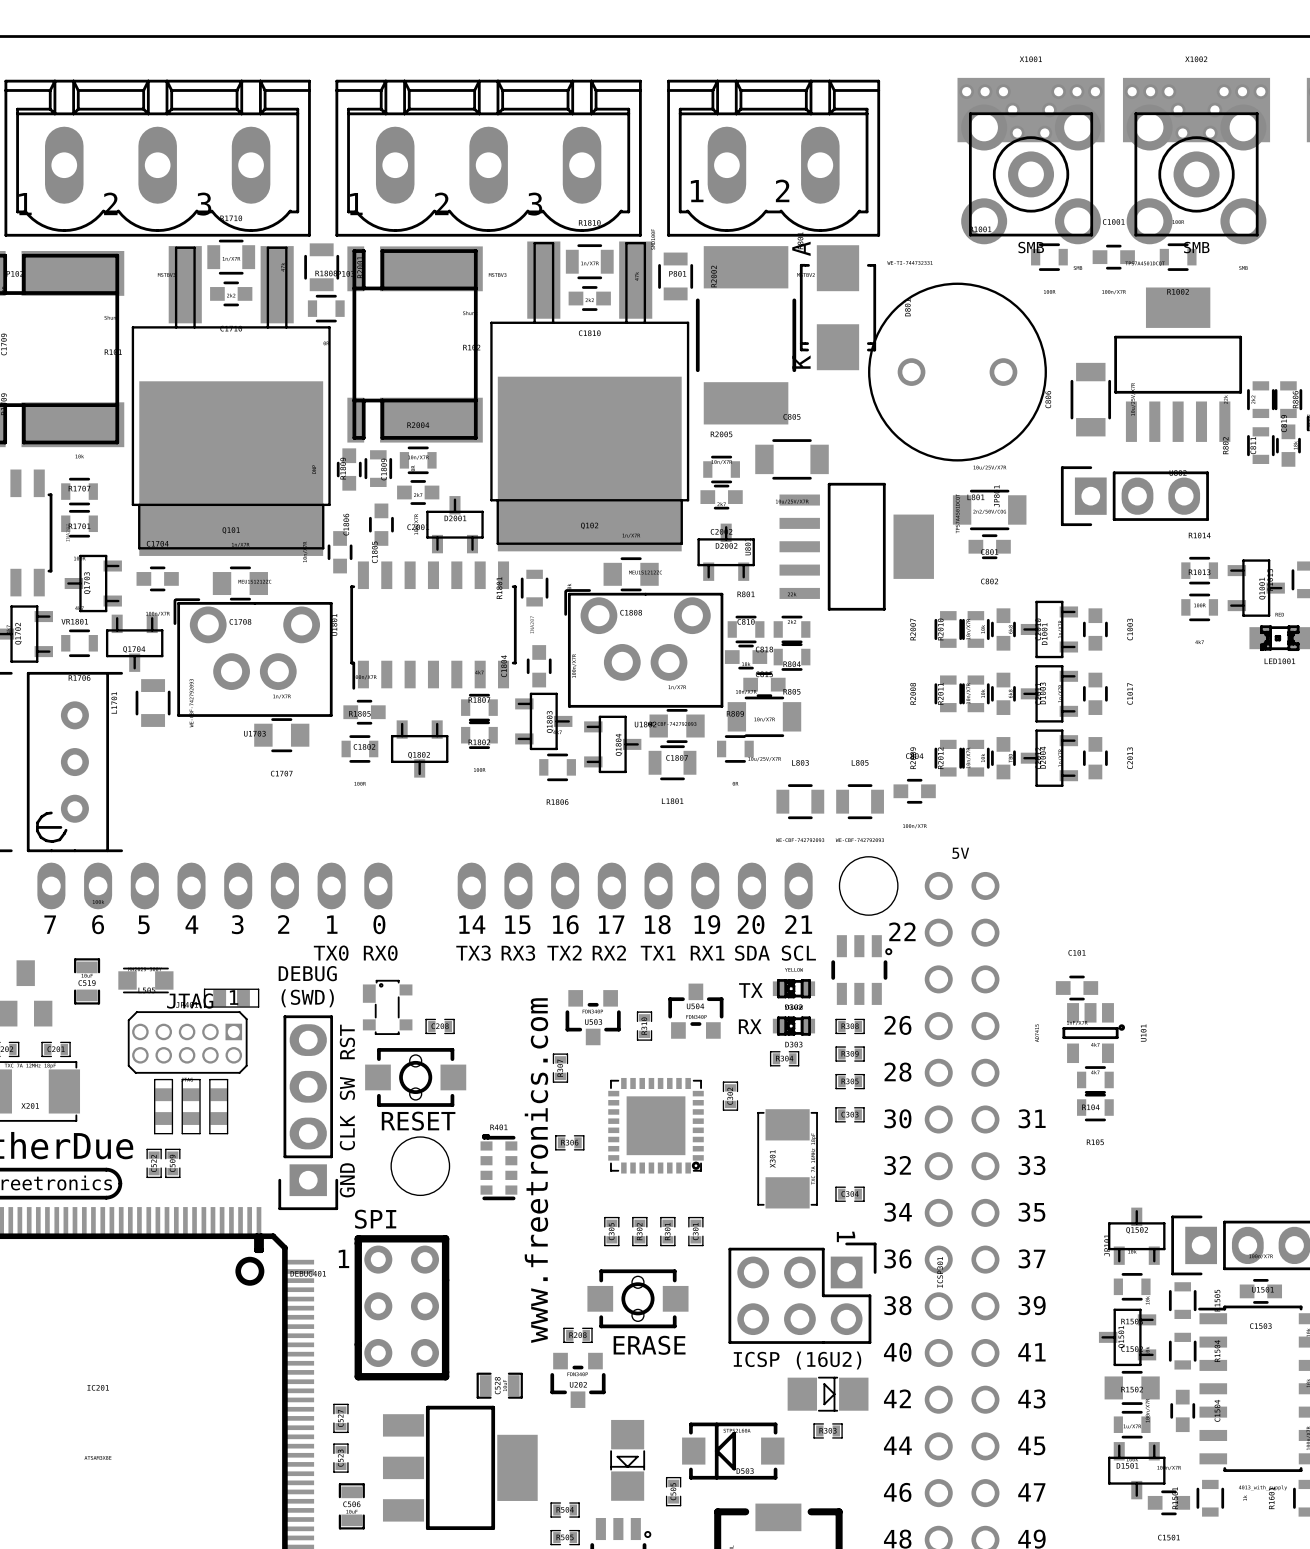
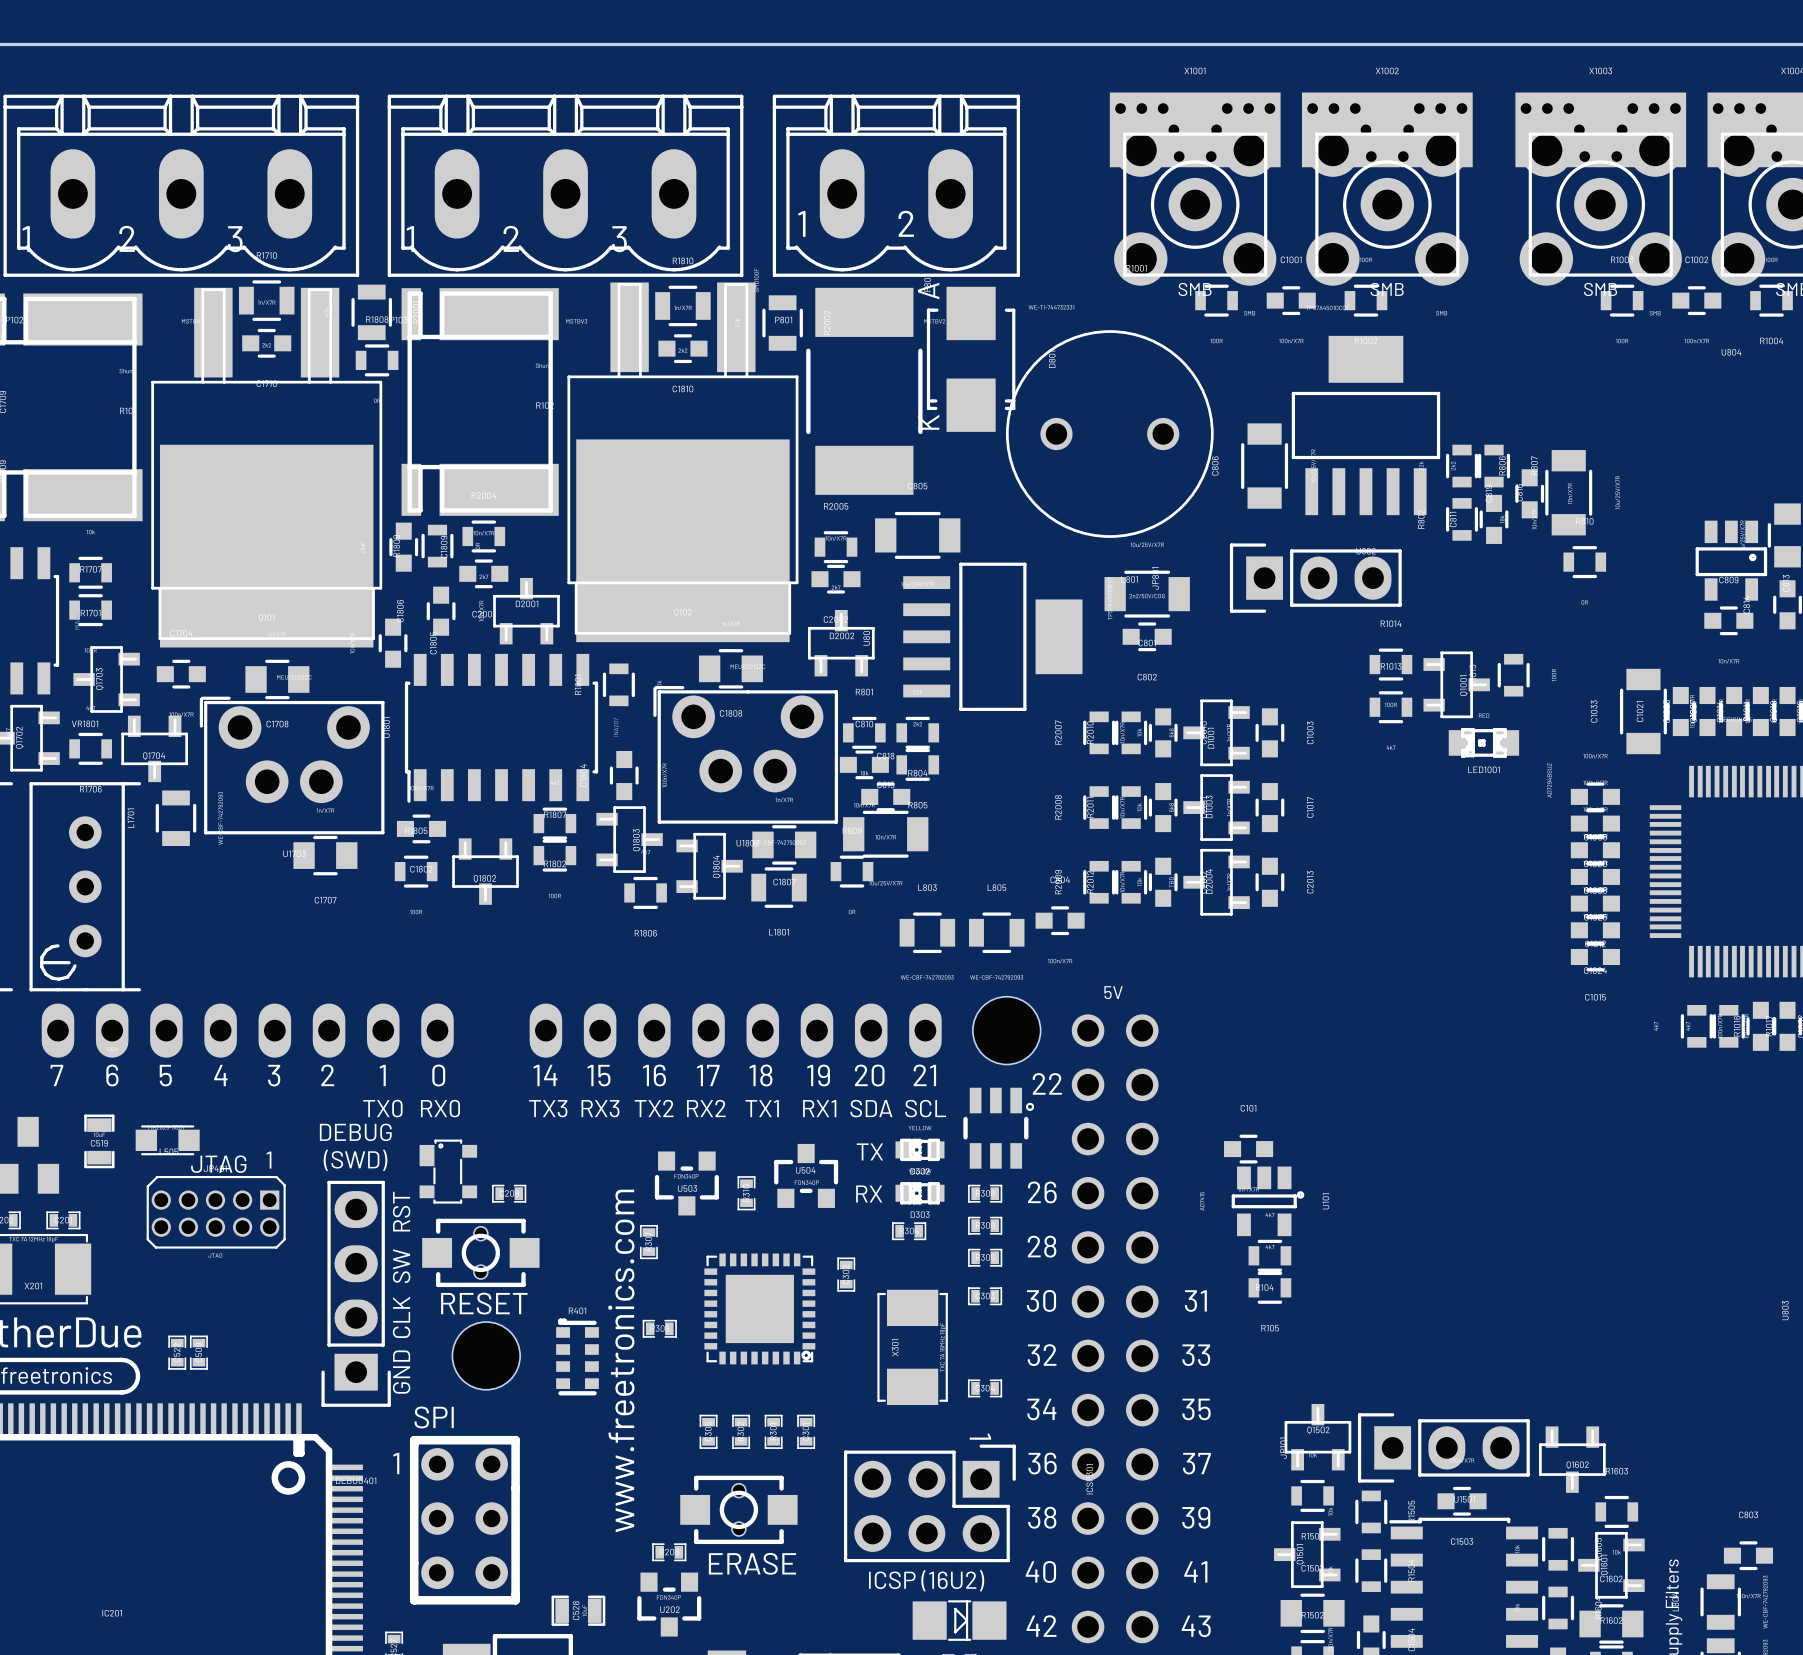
part: (231, 998) -> none
part: (163, 1106) -> none
part: (191, 1106) -> none
part: (218, 1106) -> none

